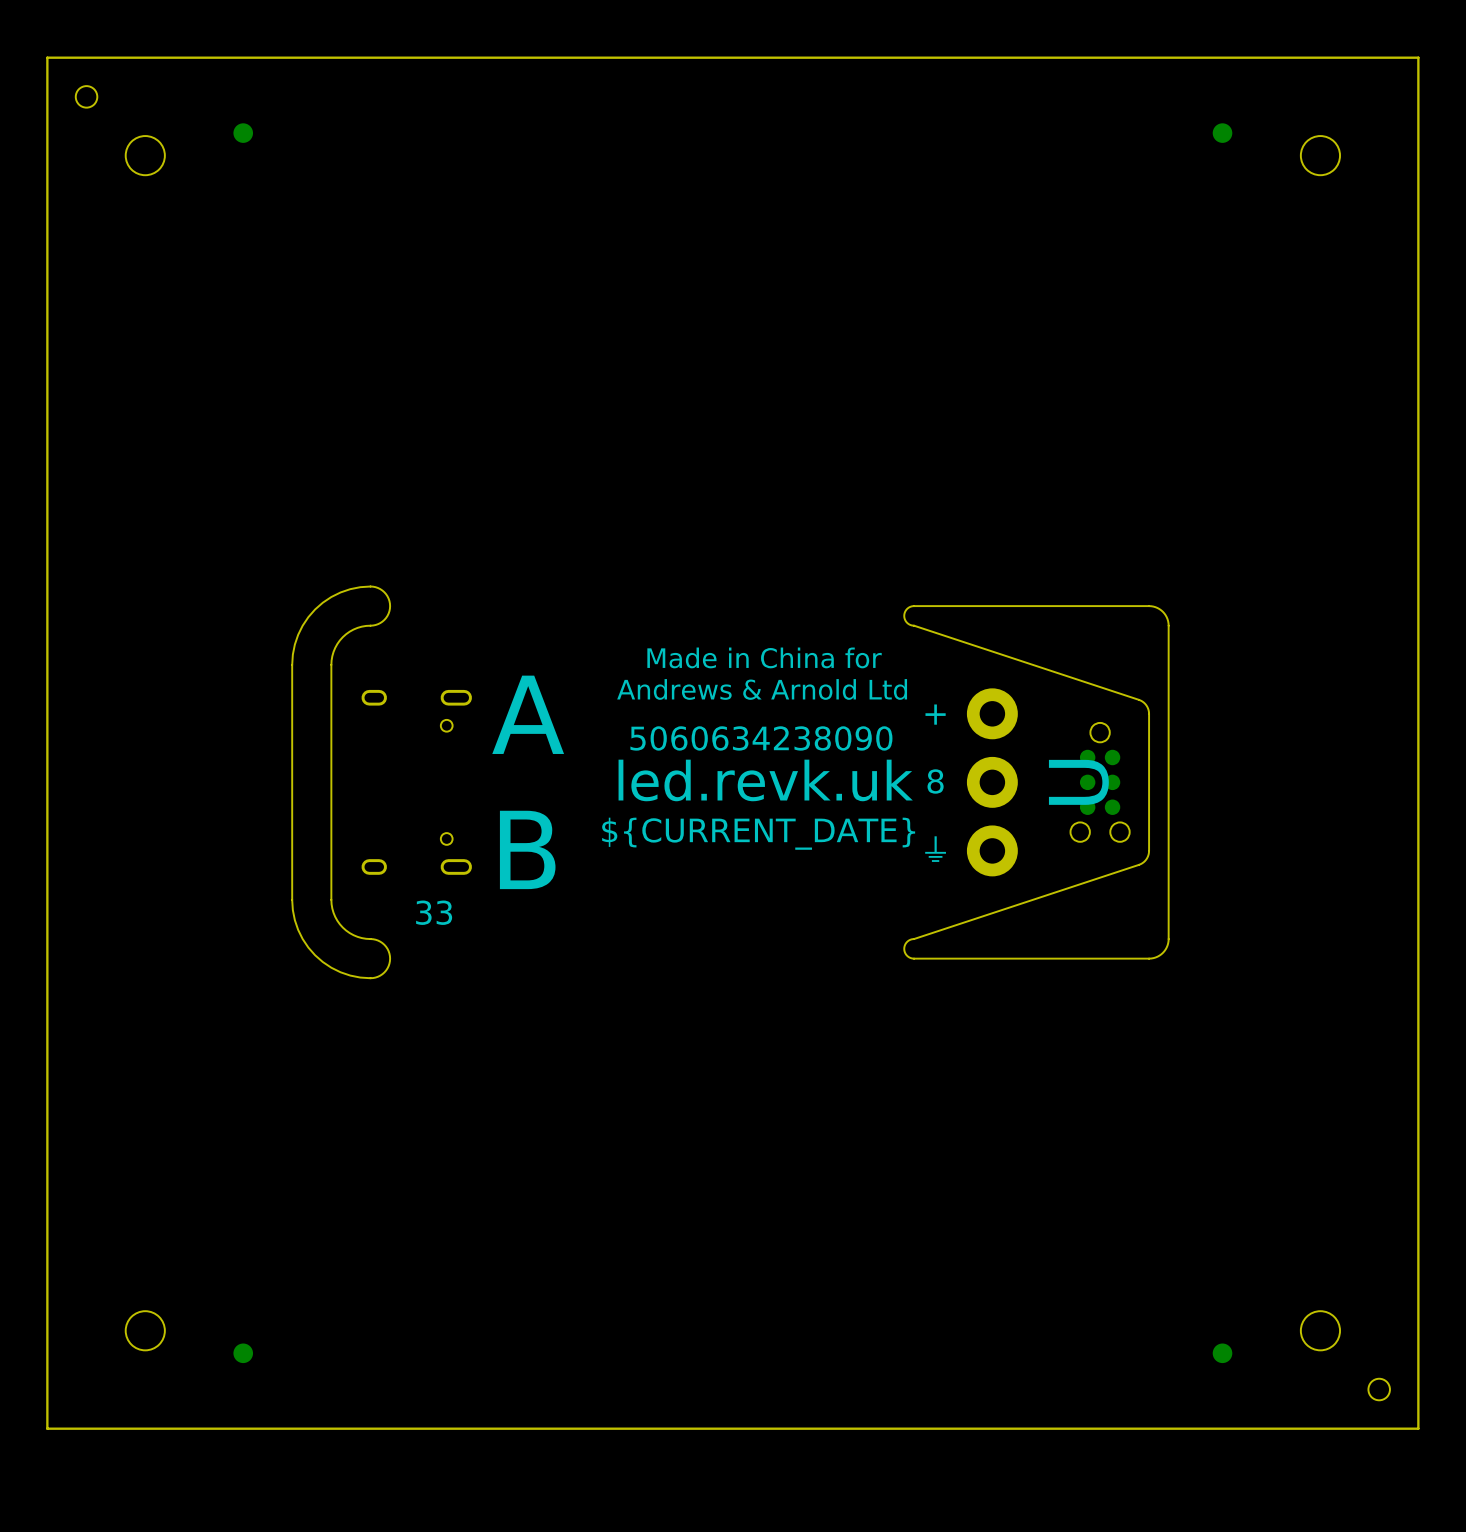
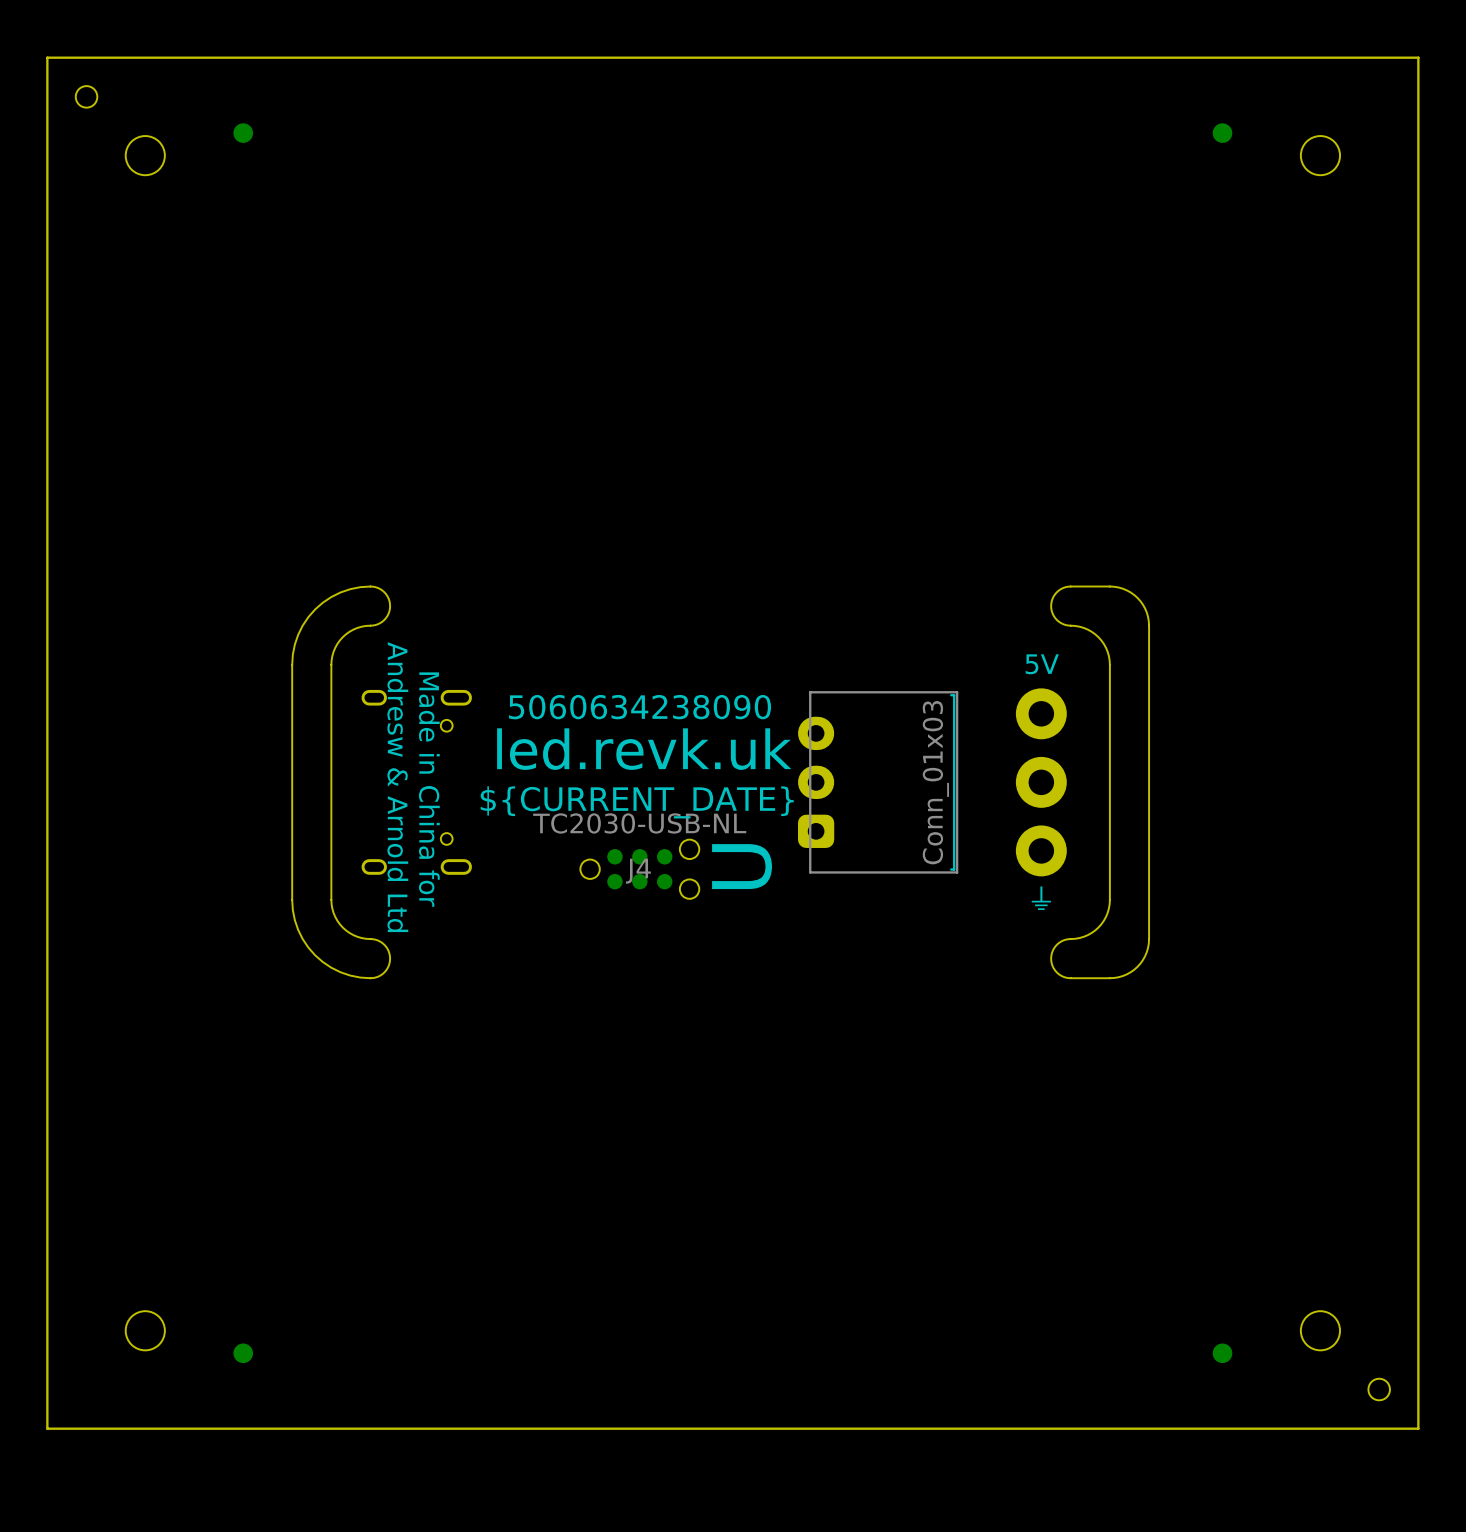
text rotation: 0° (764, 657) -> 90° clockwise (429, 789)
text position: Made in China for (764, 657) -> Made in China for (429, 789)
text: none -> 5V (1042, 664)
text: Andrews & Arnold Ltd (762, 689) -> none
board edge: (1149, 713) (1146, 705) (1139, 699) (910, 624) (904, 619) (904, 612) (908, 608) (914, 606) (1149, 606) (1162, 611) (1168, 625) (1168, 939) (1164, 951) (1157, 956) (1149, 958) (914, 958) (907, 955) (904, 947) (910, 939) (1139, 864) (1146, 859) (1149, 850) -> (1149, 713) (1148, 621) (1140, 601) (1130, 592) (1114, 586) (1068, 586) (1058, 590) (1051, 603) (1055, 618) (1063, 624) (1083, 627) (1095, 634) (1106, 647) (1109, 664) (1109, 904) (1103, 920) (1095, 930) (1083, 936) (1063, 940) (1055, 946) (1051, 961) (1058, 974) (1068, 978) (1114, 977) (1130, 972) (1140, 963) (1148, 943) (1149, 850)
text: A (528, 714) -> none
text: + (935, 714) -> none
text position: 5060634238090 (761, 738) -> 5060634238090 (640, 707)
text position: led.revk.uk (765, 780) -> led.revk.uk (644, 749)
text: 8 (935, 781) -> none
part: none -> Conn_01x03 (878, 782)
part position: (992, 782) -> (1041, 782)
text position: U (1078, 782) -> U (742, 866)
part: (1100, 782) -> none
text: none -> Andresw & Arnold Ltd (397, 787)
text position: ${CURRENT_DATE} (758, 833) -> ${CURRENT_DATE} (637, 802)
text: B (527, 849) -> none
text position: ⏚ (935, 849) -> ⏚ (1041, 898)
J4: none -> TC2030-USB-NL (639, 869)
text: 33 (434, 912) -> none

